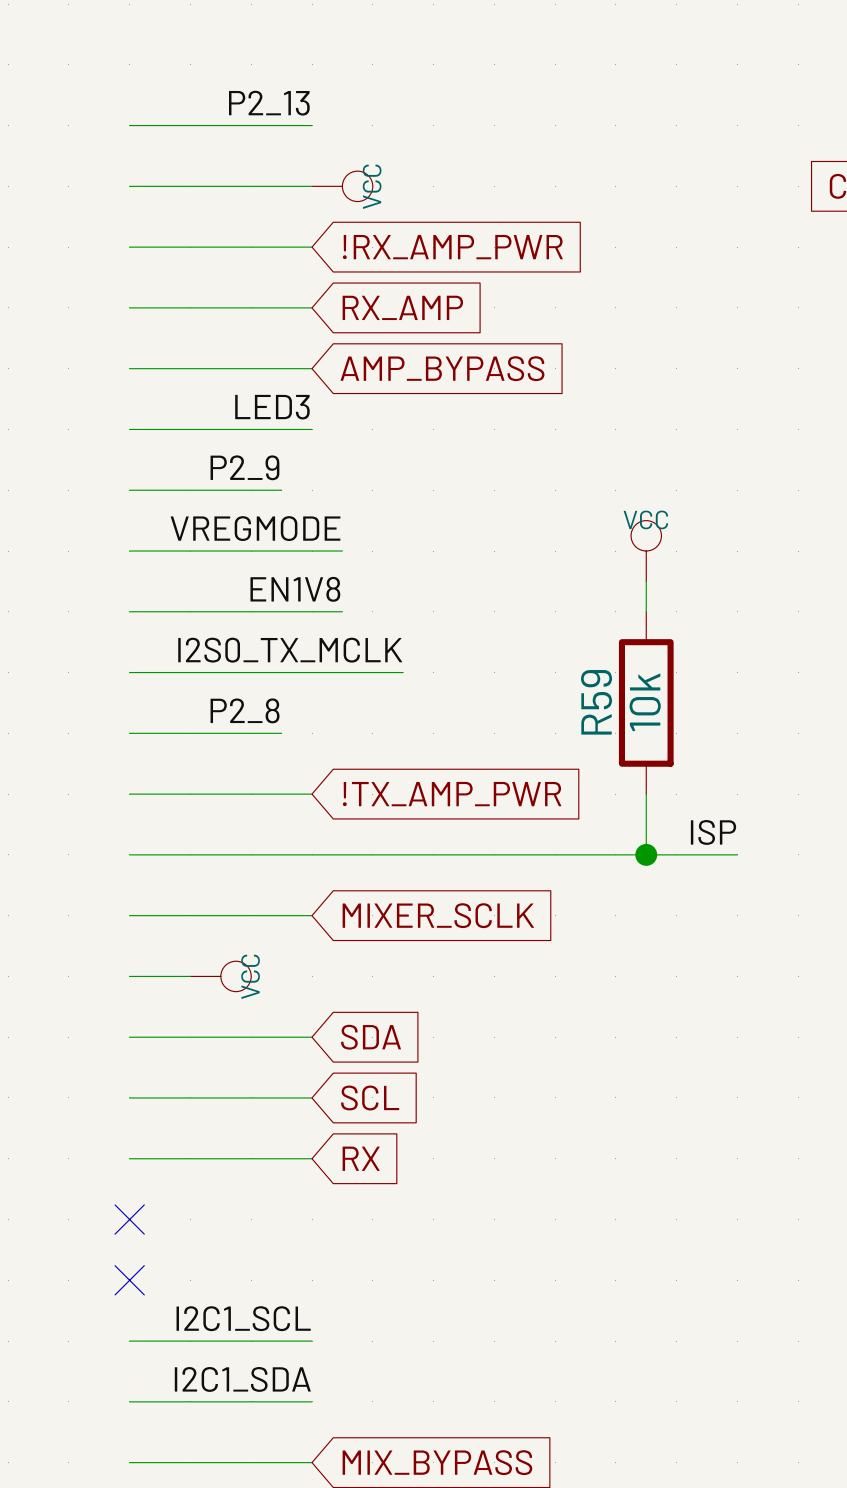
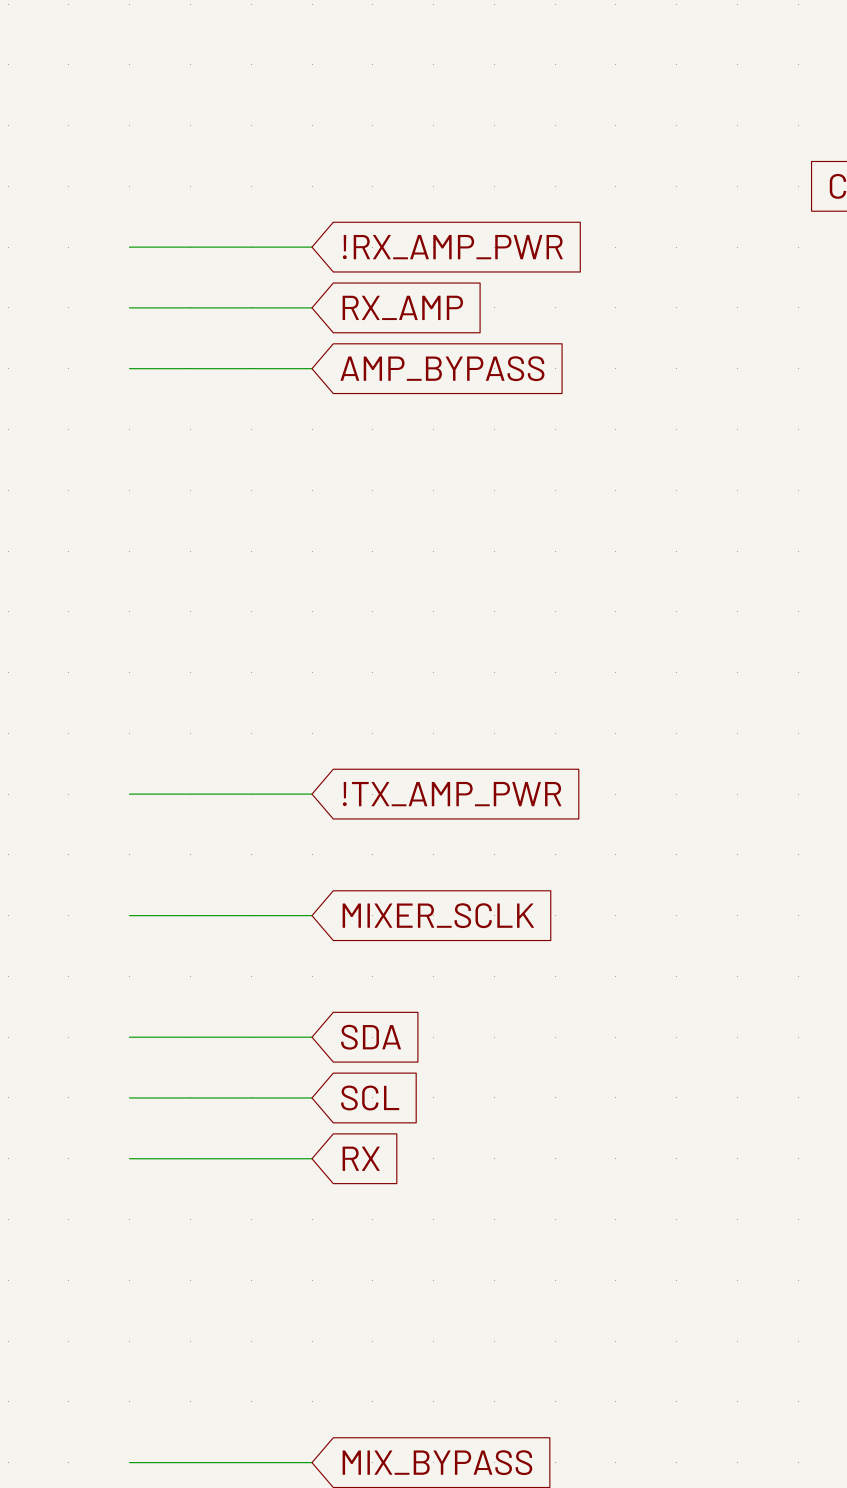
label: P2_13 (269, 103) -> none
wire: (129, 125) (312, 125) -> none
wire: (129, 186) (312, 186) -> none
power symbol: VCC (342, 186) -> none
label: LED3 (272, 407) -> none
wire: (129, 429) (312, 429) -> none
label: P2_9 (244, 467) -> none
wire: (129, 490) (281, 490) -> none
label: VREGMODE (255, 528) -> none
wire: (129, 551) (342, 551) -> none
power symbol: VCC (646, 551) -> none
wire: (646, 581) (646, 611) -> none
label: EN1V8 (295, 589) -> none
wire: (129, 611) (342, 611) -> none
label: I2S0_TX_MCLK (290, 650) -> none
wire: (129, 672) (403, 672) -> none
R59: 10k (646, 702) -> none
label: P2_8 (245, 710) -> none
wire: (129, 733) (281, 733) -> none
wire: (646, 794) (646, 854) -> none
label: ISP (713, 832) -> none
wire: (129, 854) (737, 854) -> none
junction: (646, 854) -> none
wire: (129, 976) (190, 976) -> none
power symbol: VCC (220, 976) -> none
no-connect mark: (129, 1219) -> none
no-connect mark: (129, 1280) -> none
label: I2C1_SCL (243, 1318) -> none
wire: (129, 1341) (312, 1341) -> none
label: I2C1_SDA (242, 1379) -> none
wire: (129, 1401) (312, 1401) -> none

